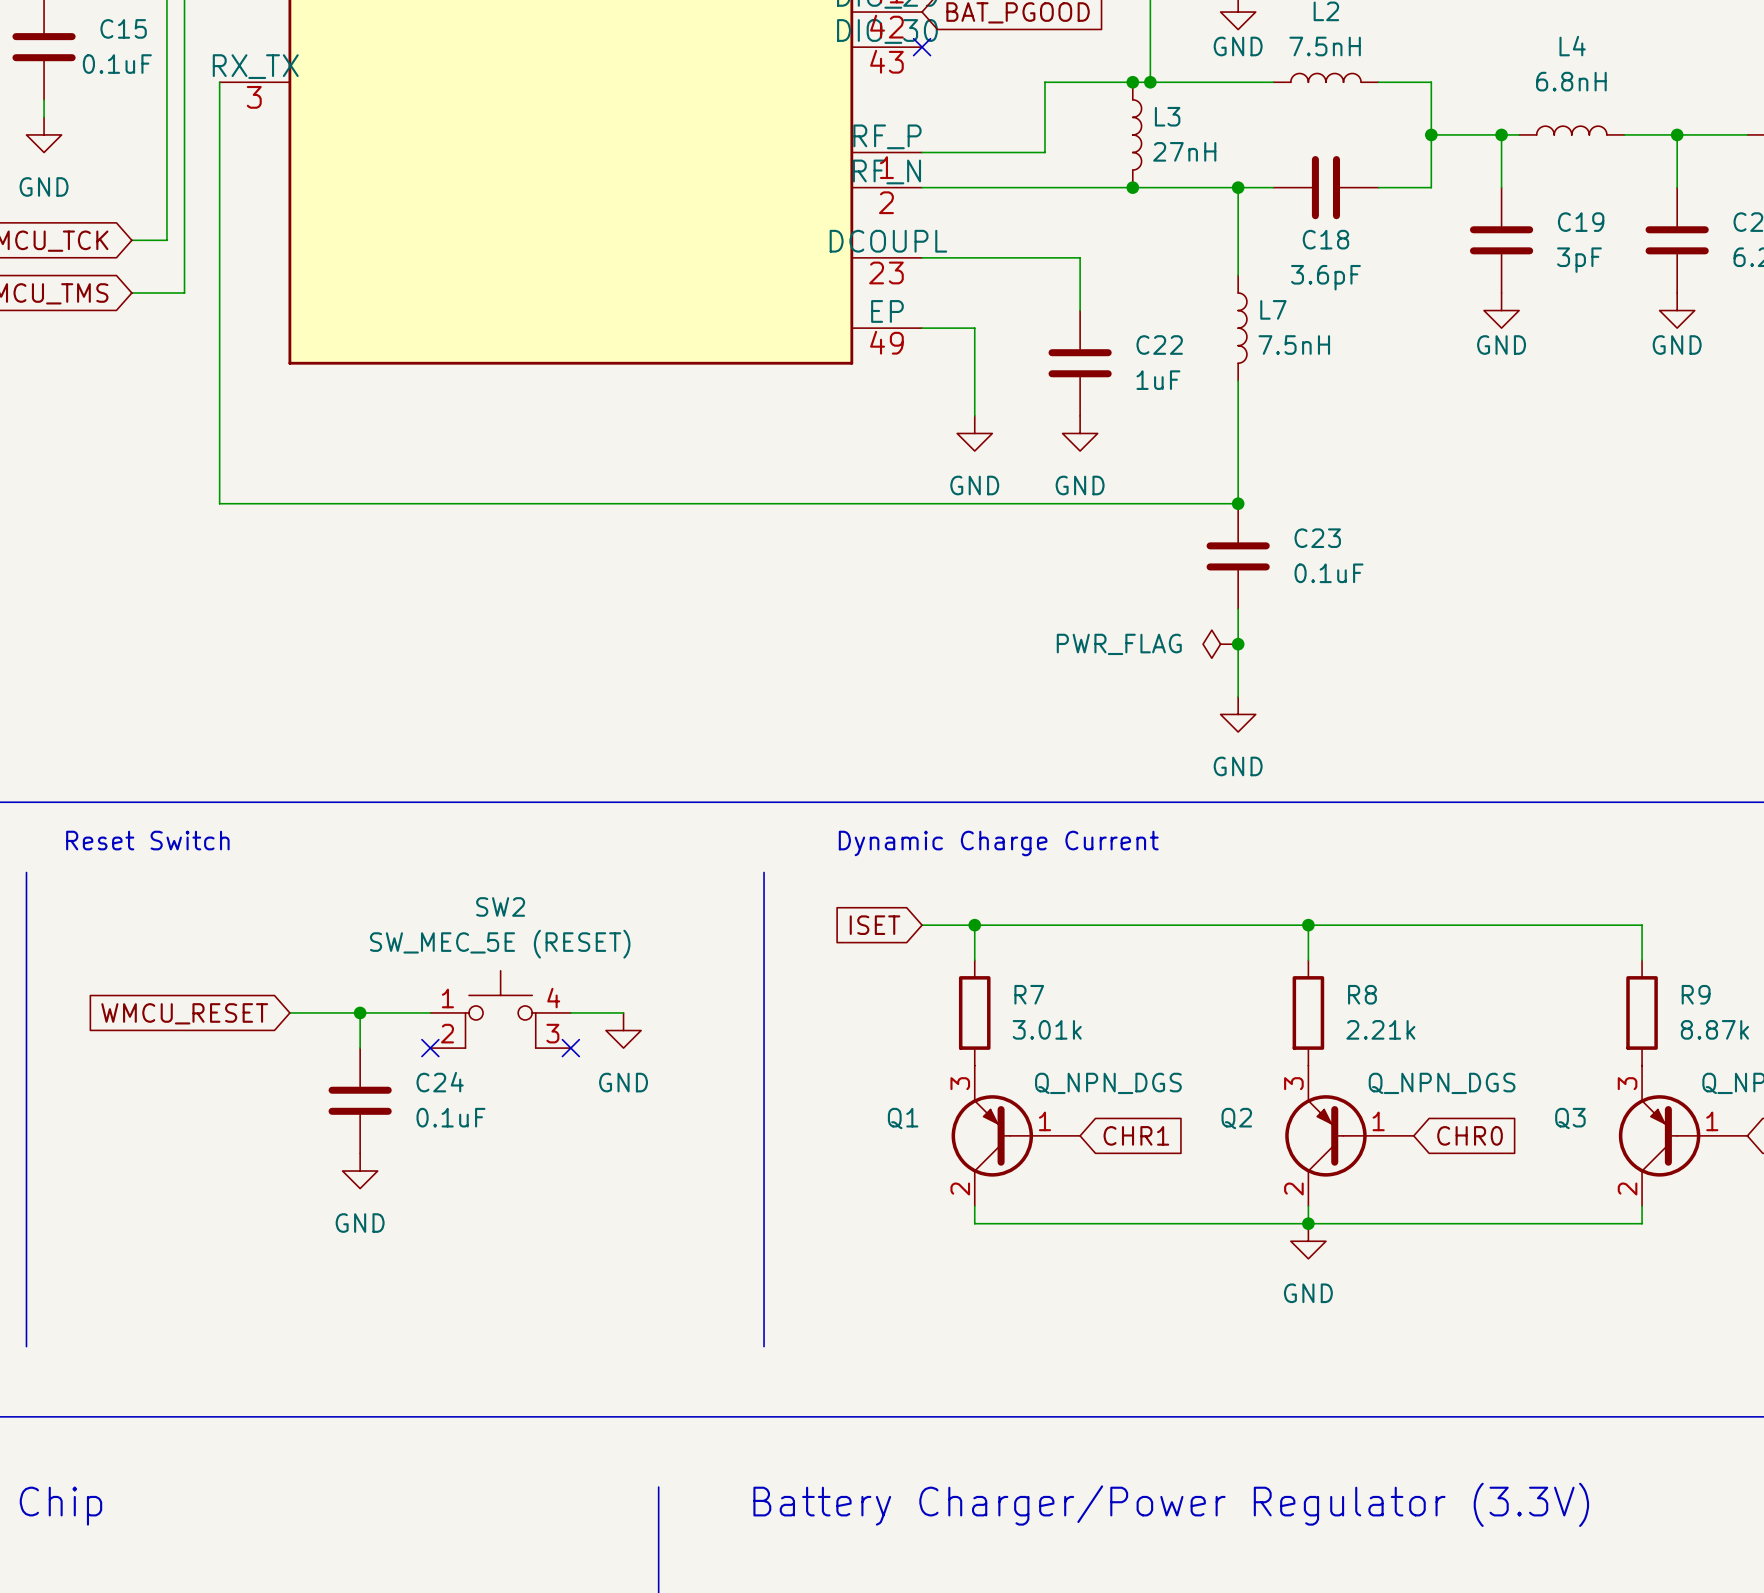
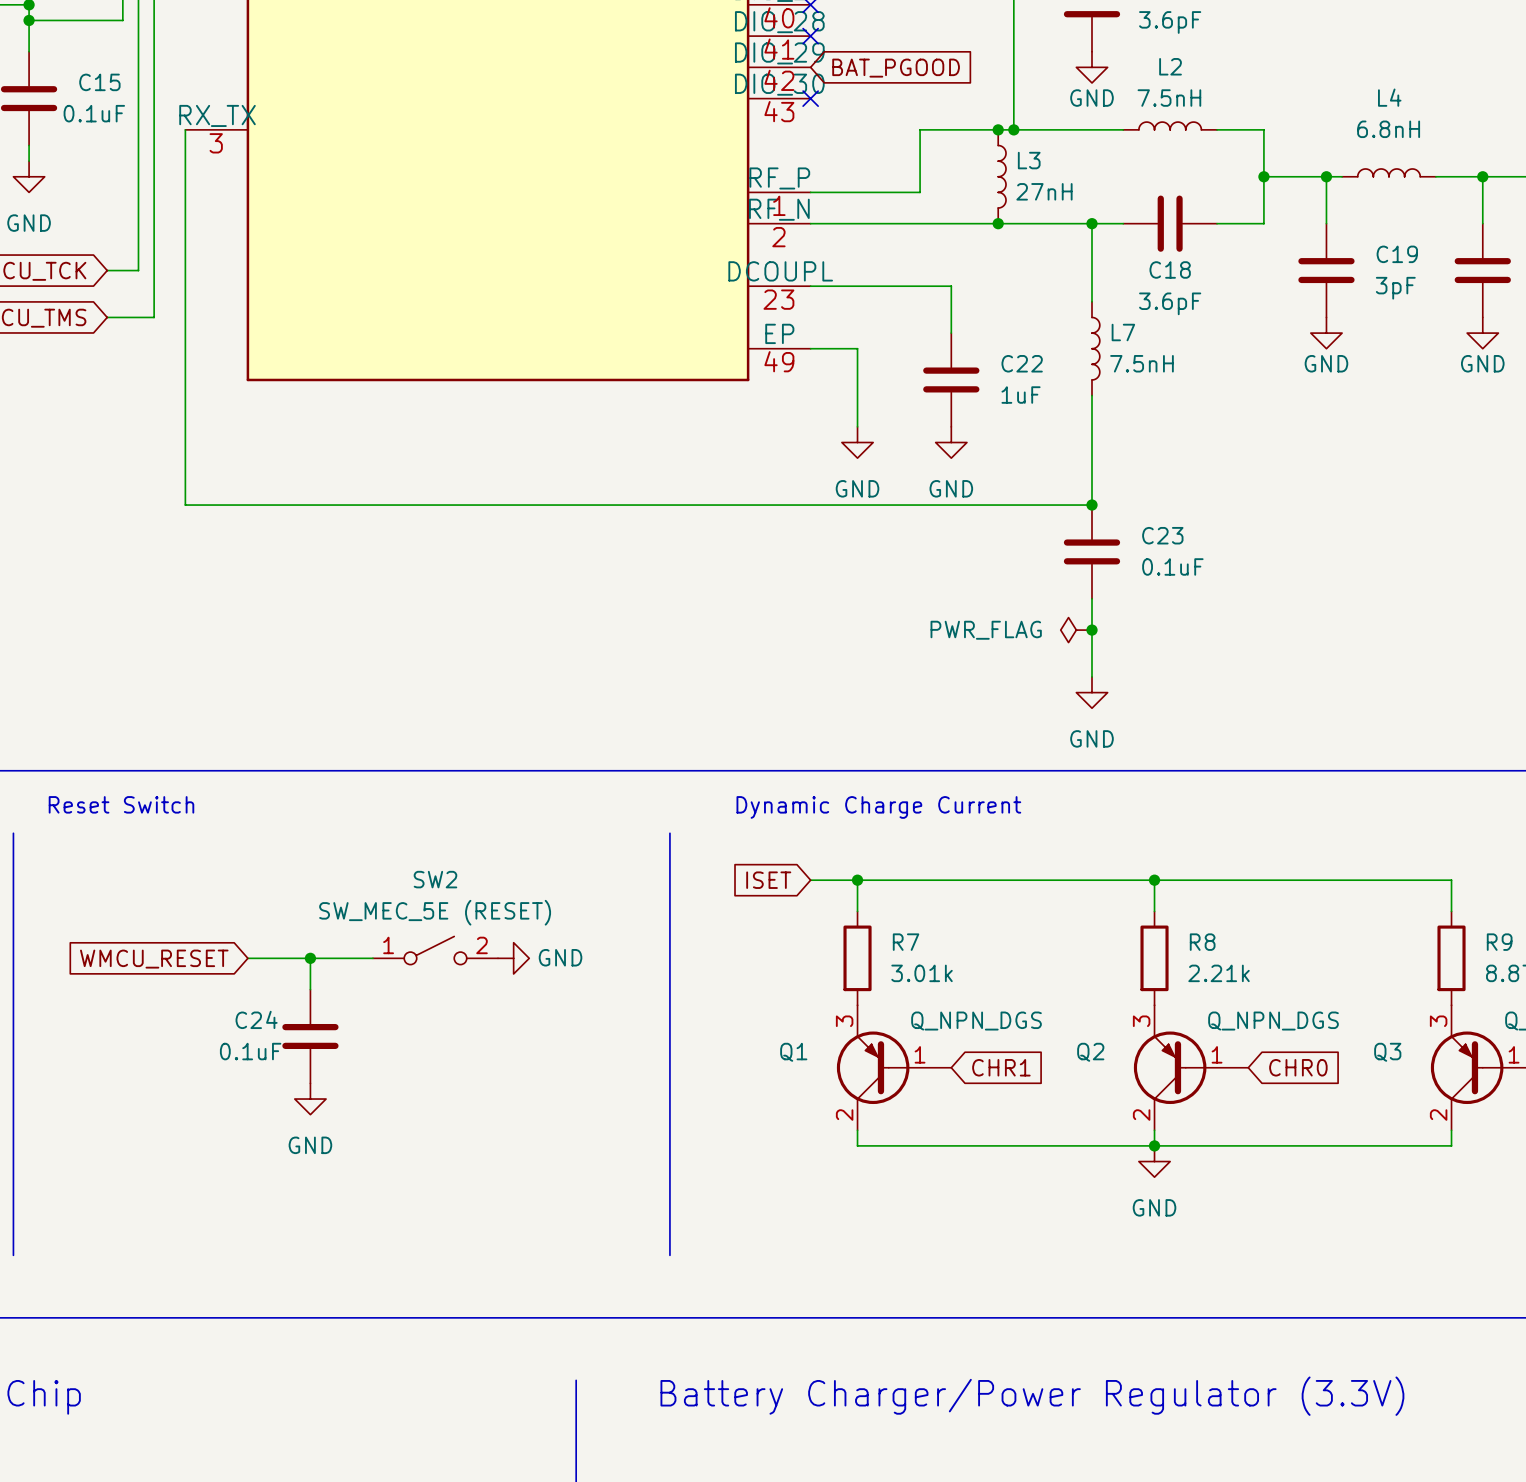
SW2 symbol: [430, 970, 571, 1049] -> [372, 936, 499, 965]
wire: (570, 1012) (623, 1012) -> none
power symbol rotation: 0° (623, 1030) -> 90° counterclockwise (513, 958)
power symbol position: GND (623, 1030) -> GND (513, 958)
no-connect mark: (430, 1048) -> none
no-connect mark: (570, 1048) -> none
C24 name position: C24 (440, 1082) -> C24 (256, 1019)
C24 value position: 0.1uF (450, 1117) -> 0.1uF (250, 1051)

